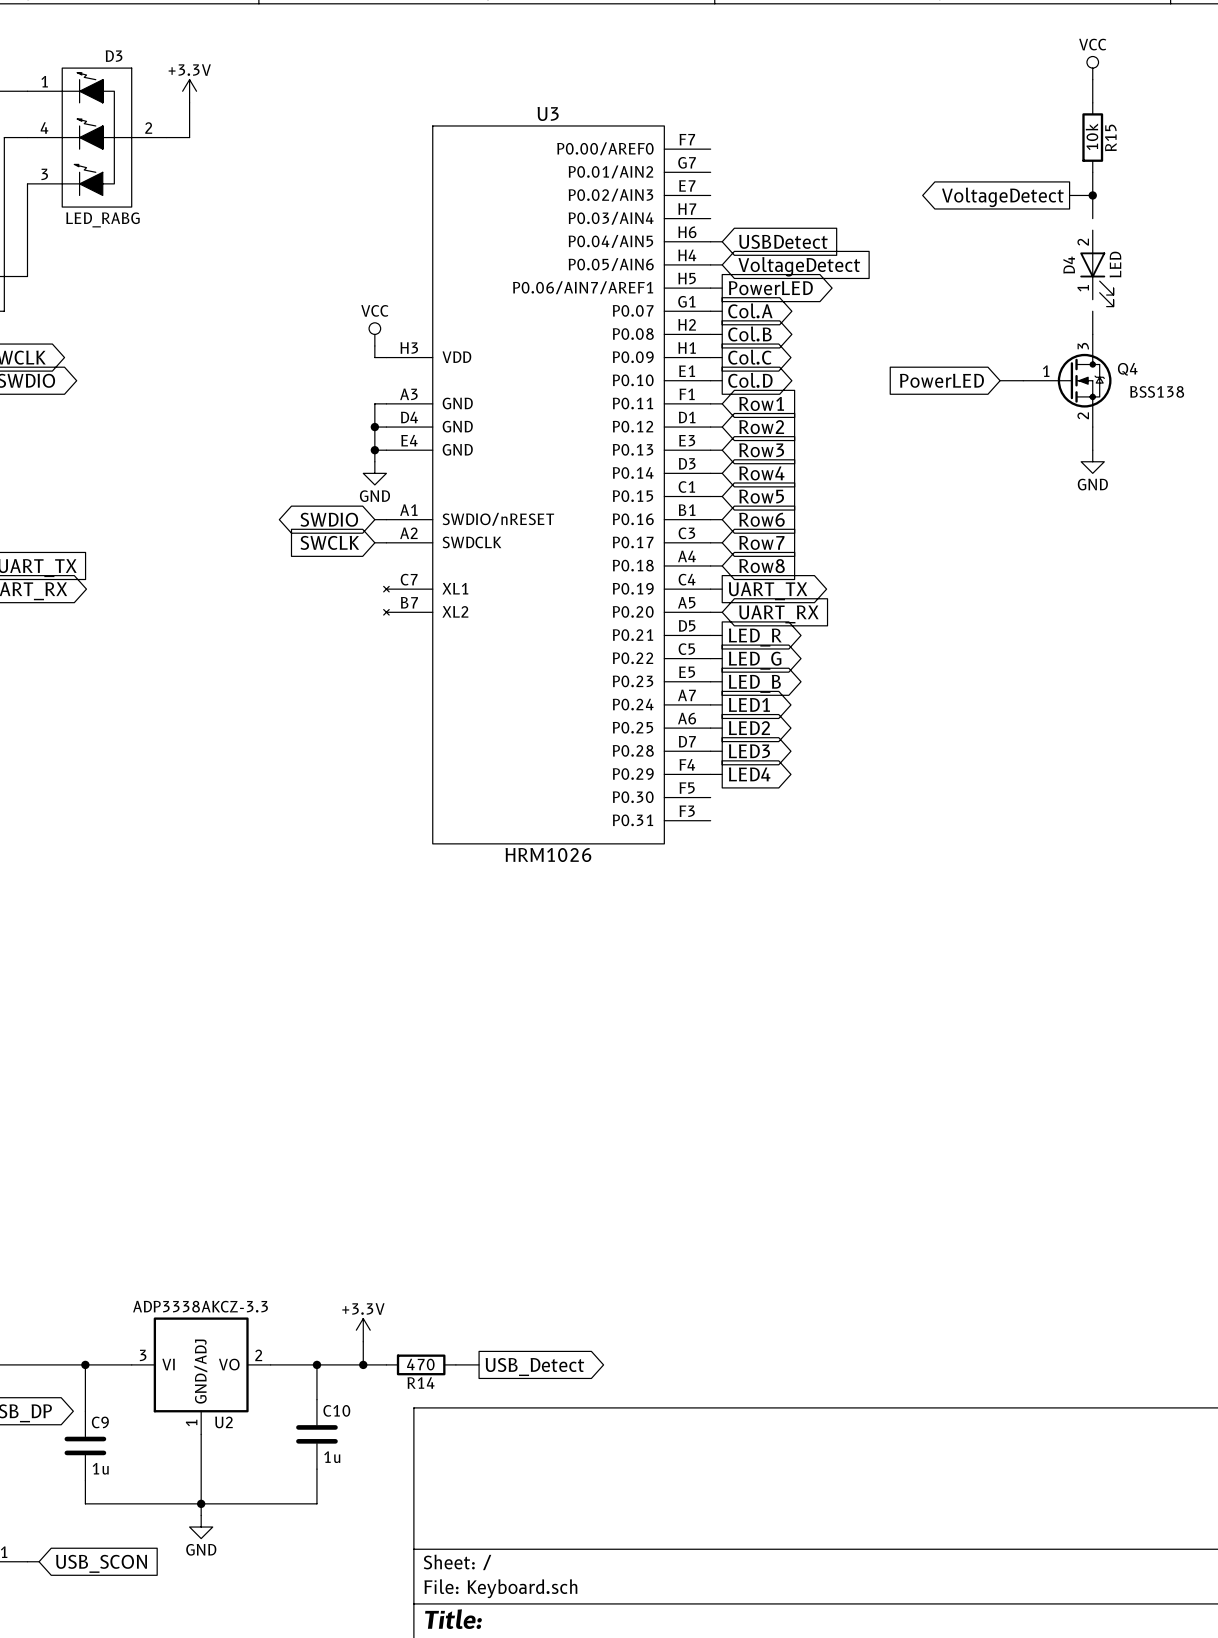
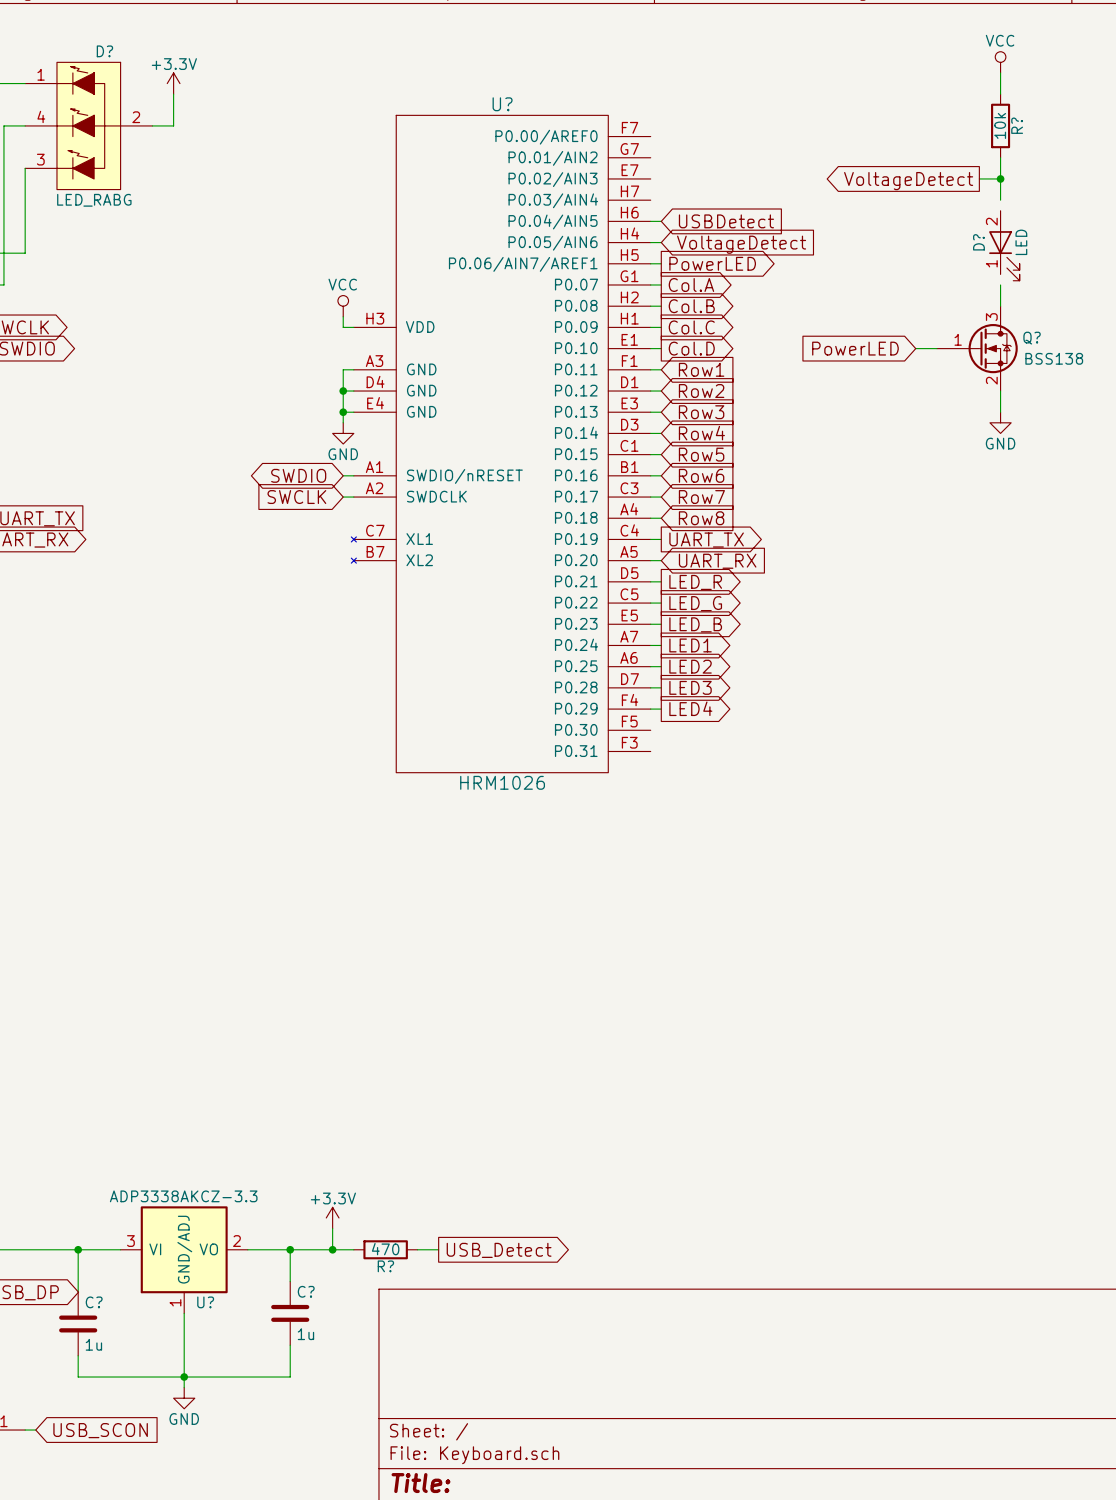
D3 name: D3 (114, 56) -> D? (104, 51)
U3 name: U3 (548, 113) -> U? (502, 104)
R15 name: R15 (1110, 137) -> R? (1017, 125)
D4 name: D4 (1069, 265) -> D? (978, 242)
Q4 name: Q4 (1127, 369) -> Q? (1032, 338)
R14 name: R14 (421, 1383) -> R? (385, 1266)
C10 name: C10 (336, 1410) -> C? (306, 1291)
C9 name: C9 (100, 1422) -> C? (94, 1302)
U2 name: U2 (223, 1422) -> U? (205, 1302)

